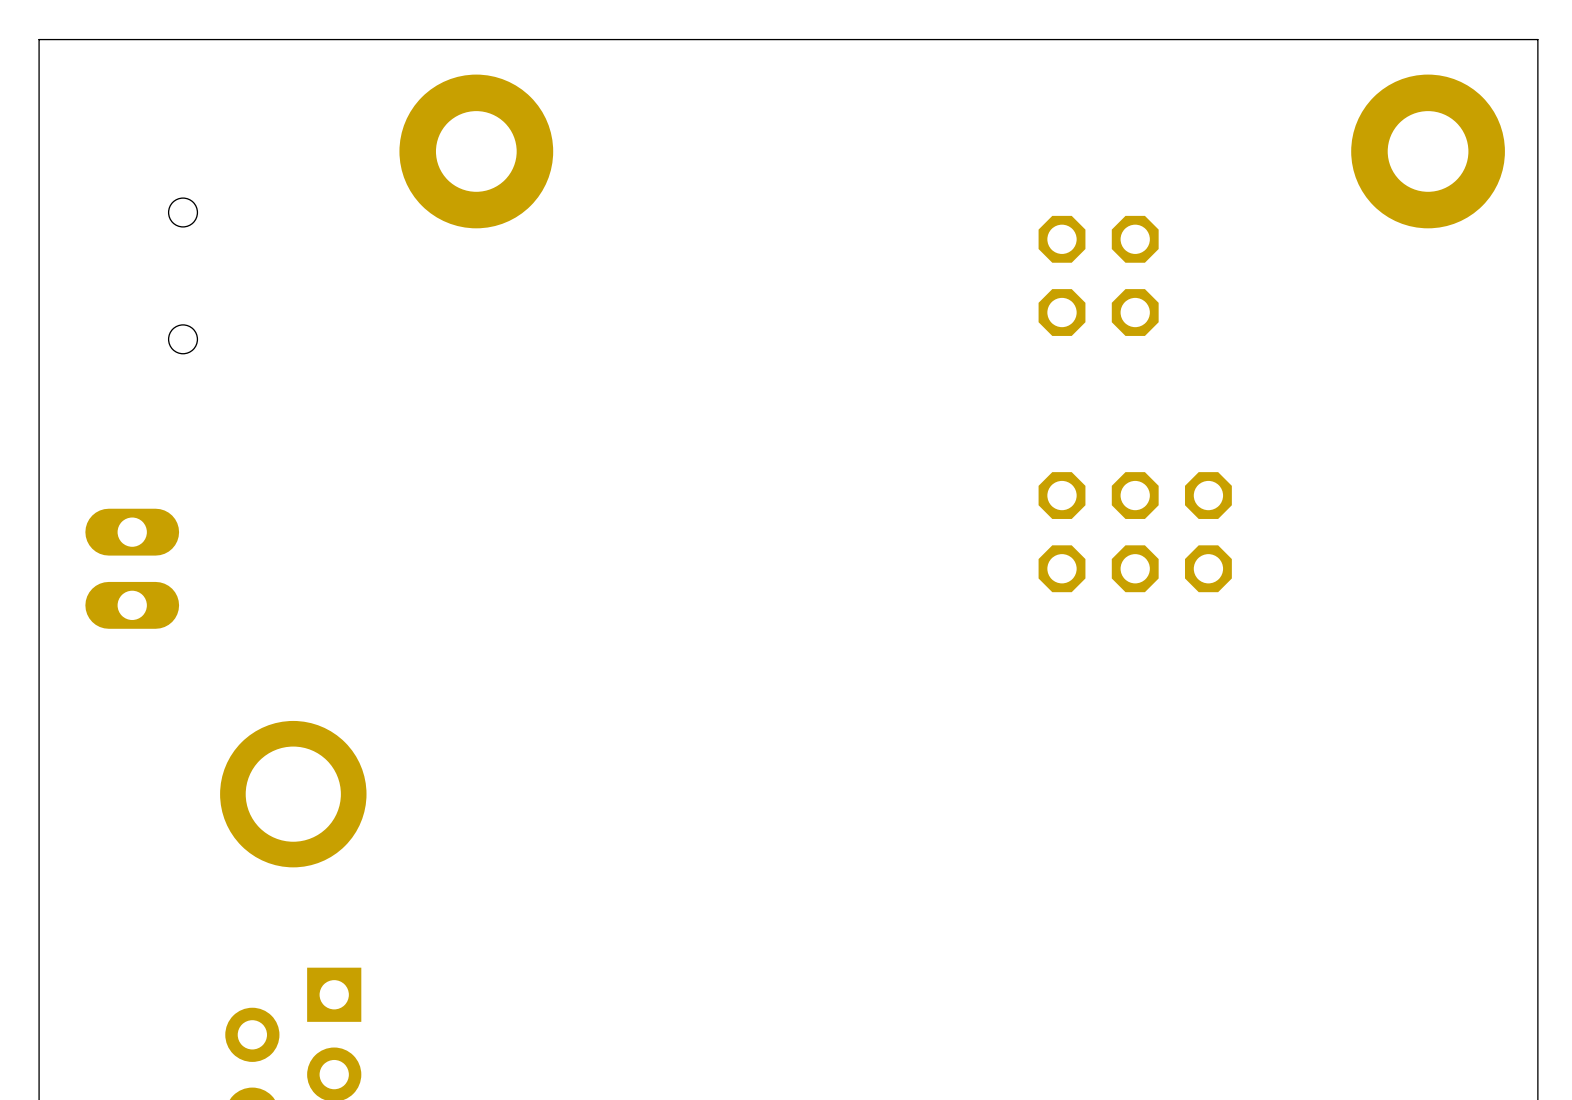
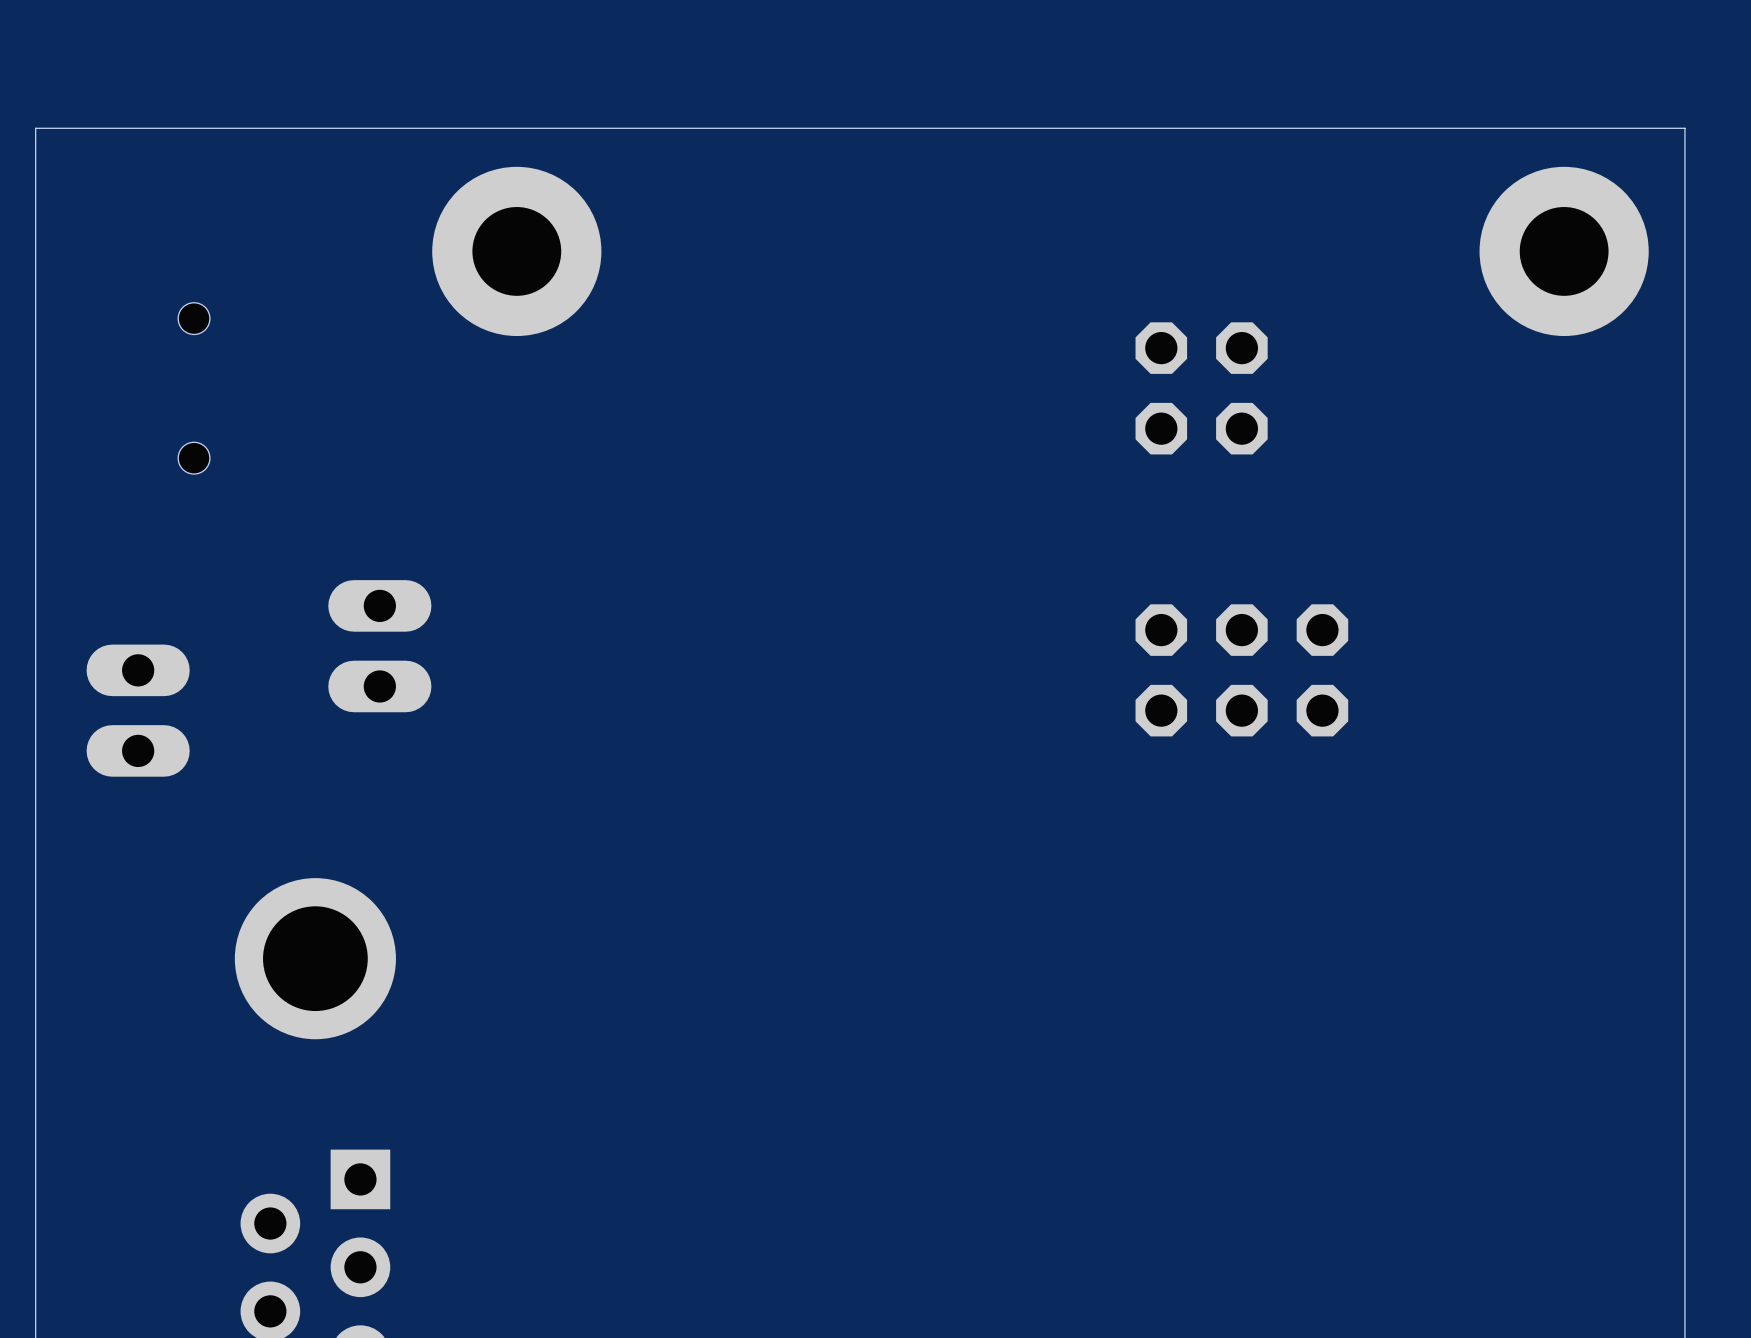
part: none -> (379, 646)

